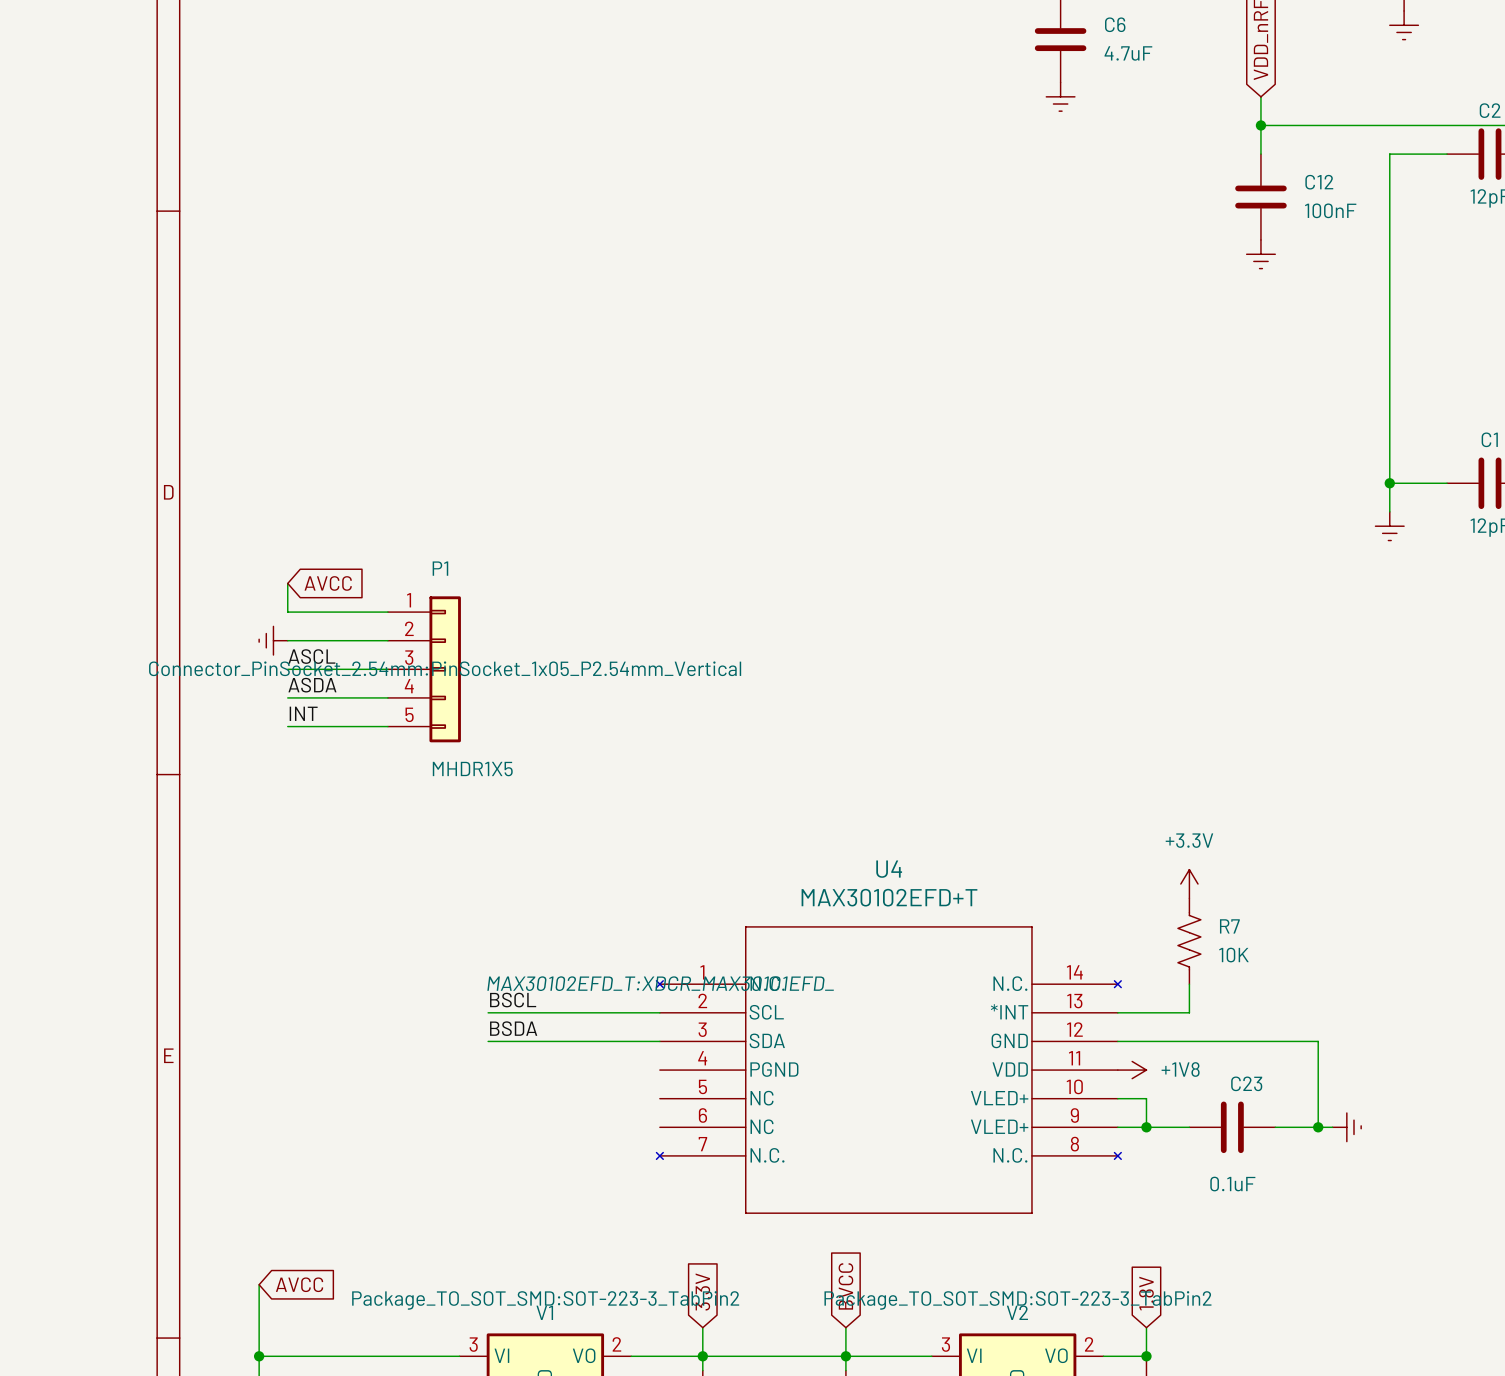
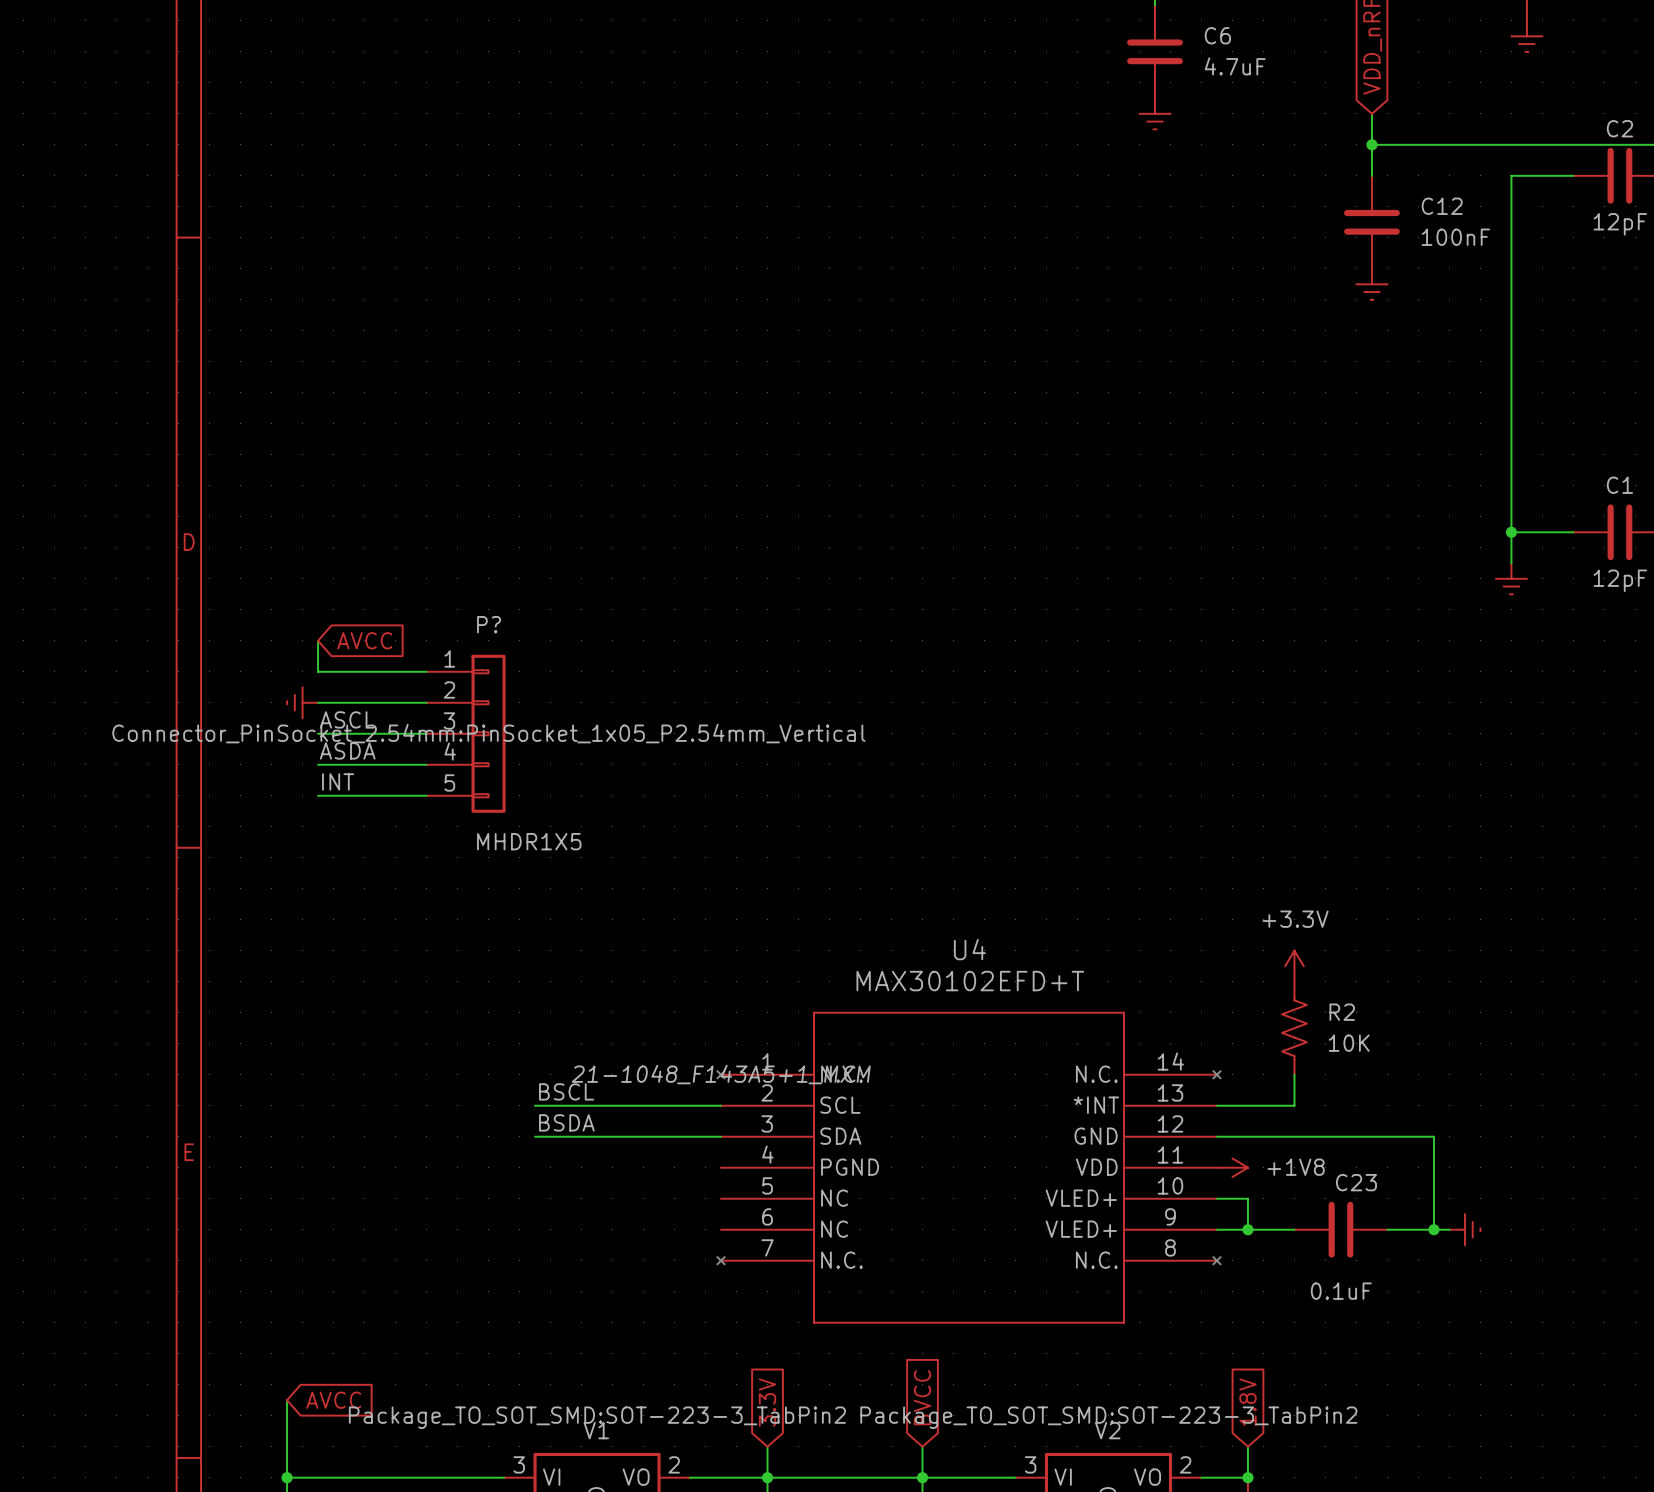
P1 name: P1 (440, 568) -> P? (489, 624)
R7 name: R7 (1229, 926) -> R2 (1342, 1012)
U4 text: MAX30102EFD_T:XDCR_MAX30101EFD_ (660, 983) -> 21-1048_F143A5+1_MXM (721, 1074)

